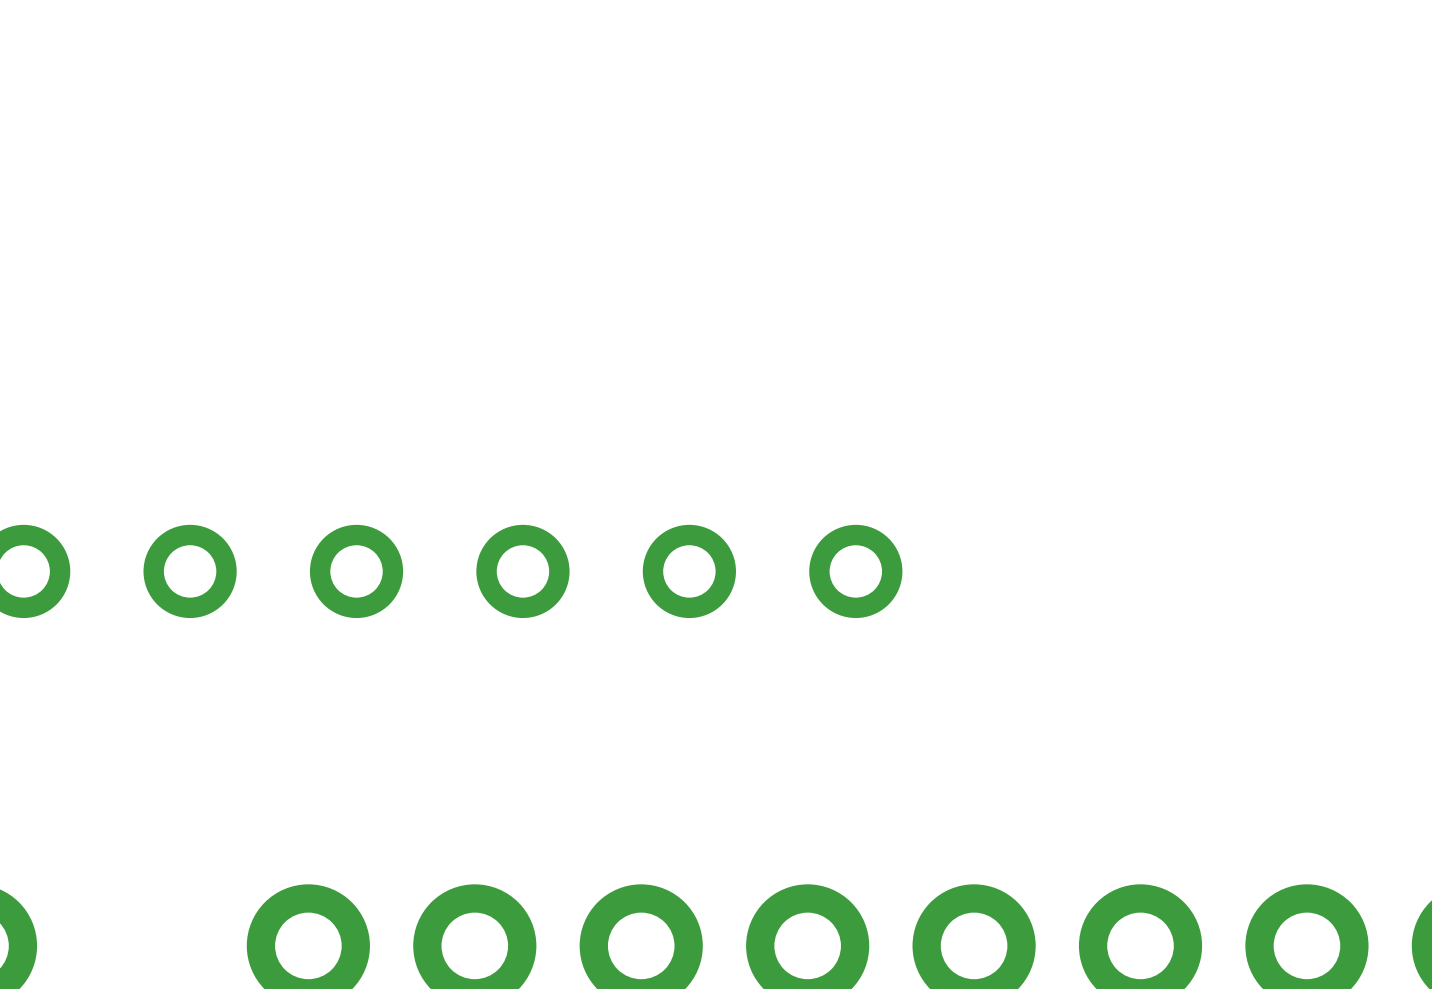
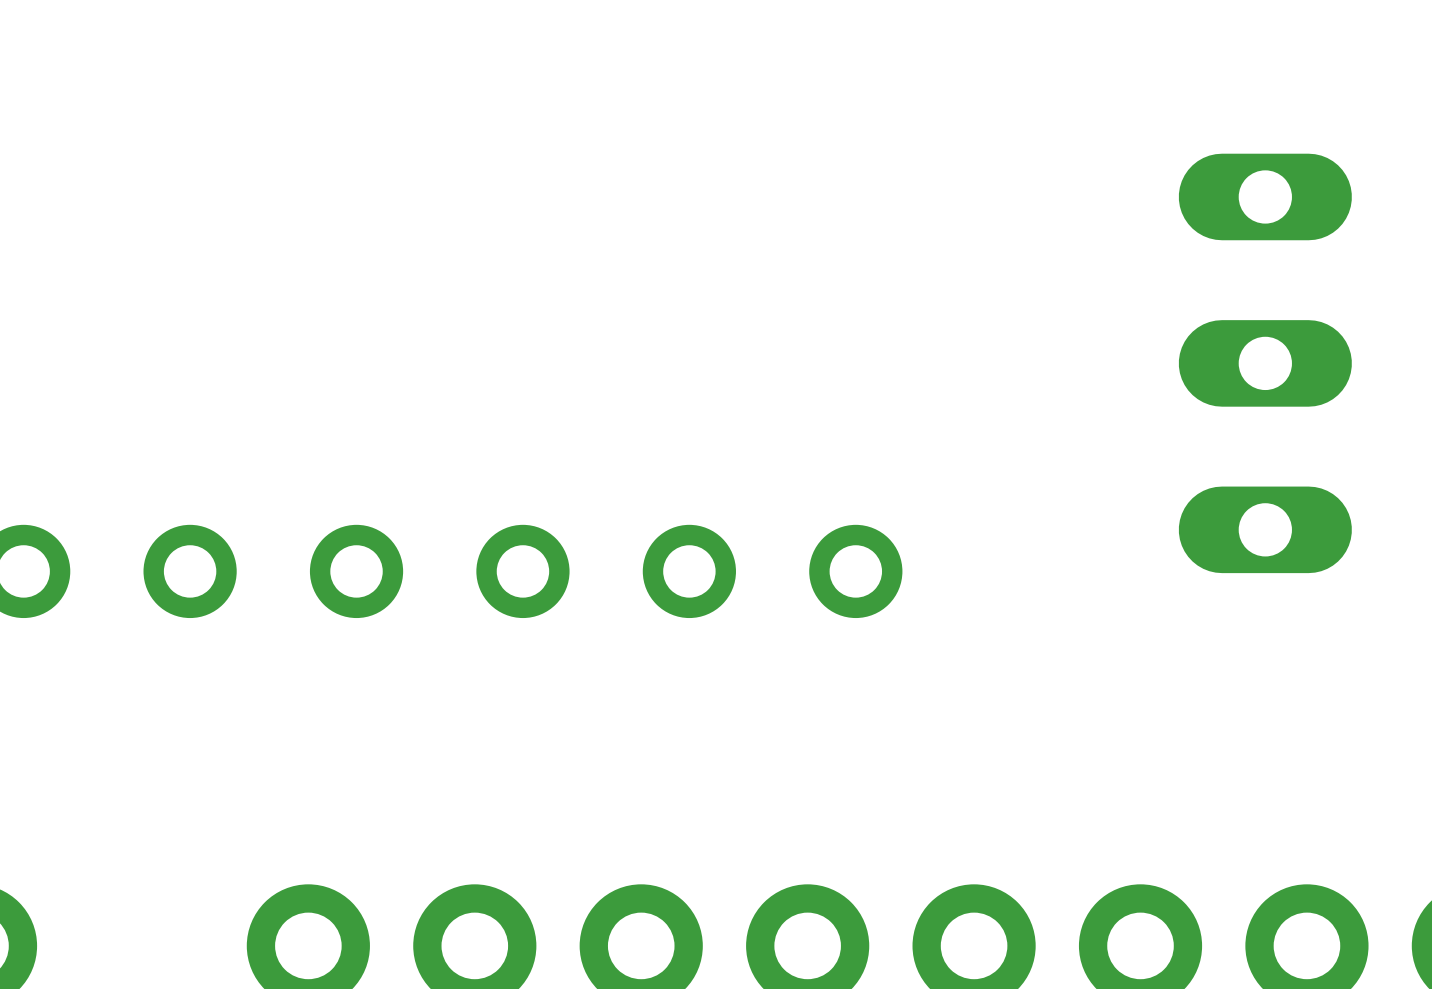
part: none -> (1265, 363)

